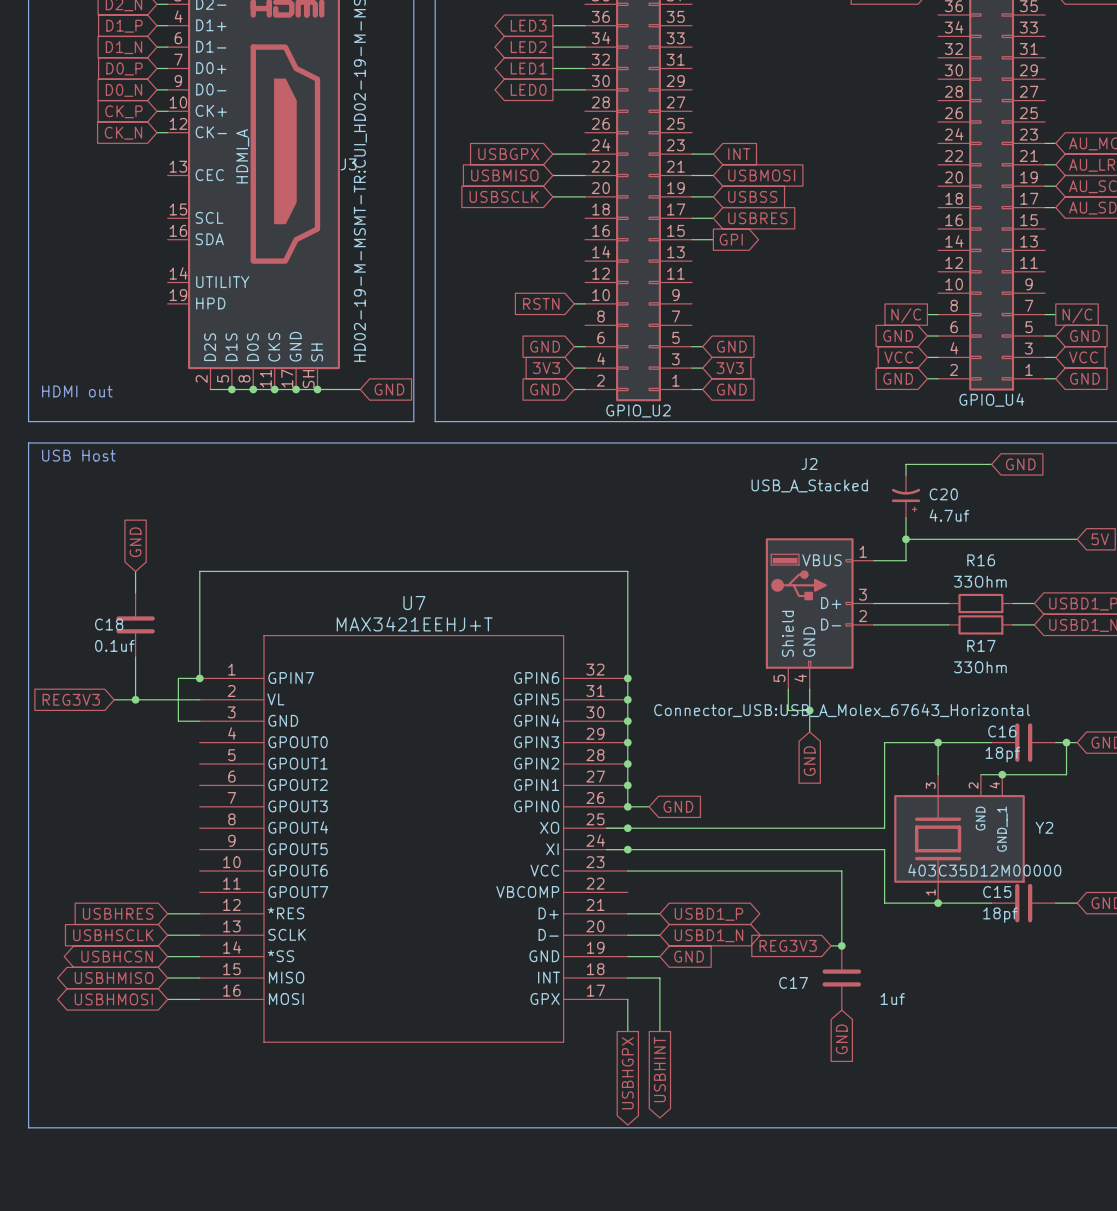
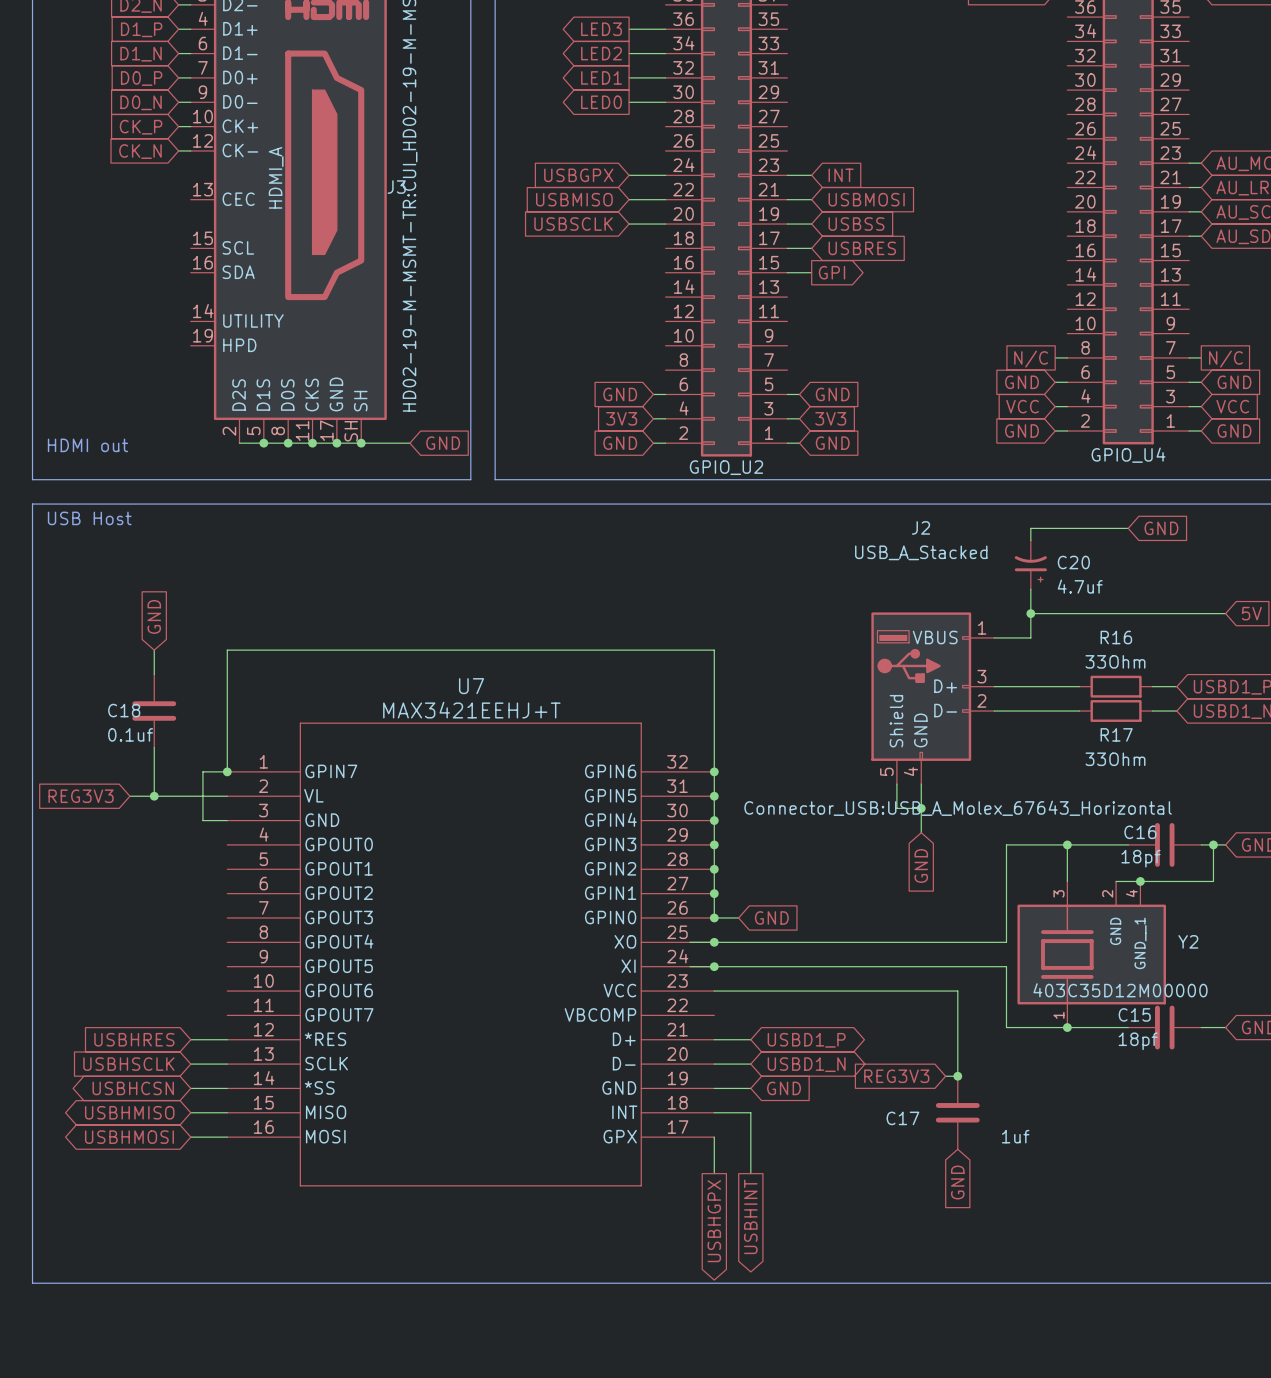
global label: RSTN (541, 303) -> none
wire: (574, 303) (584, 303) -> none

